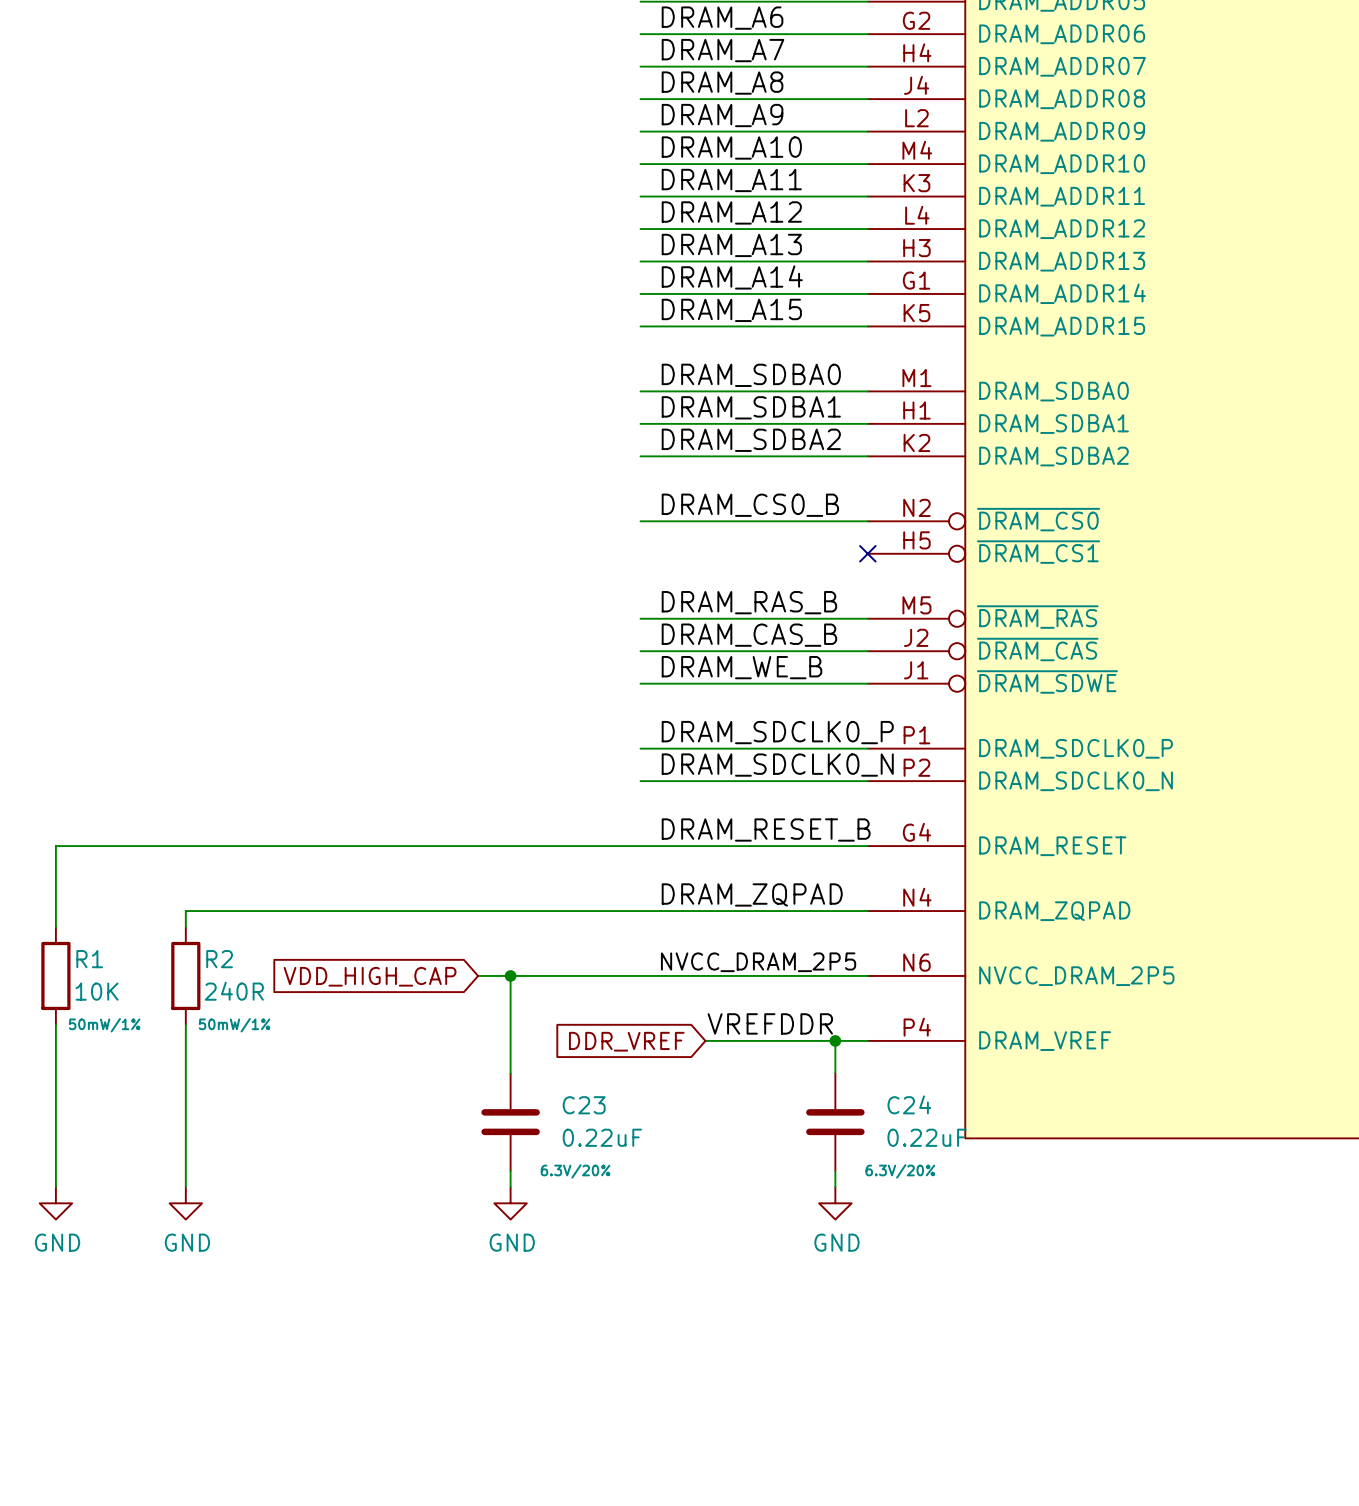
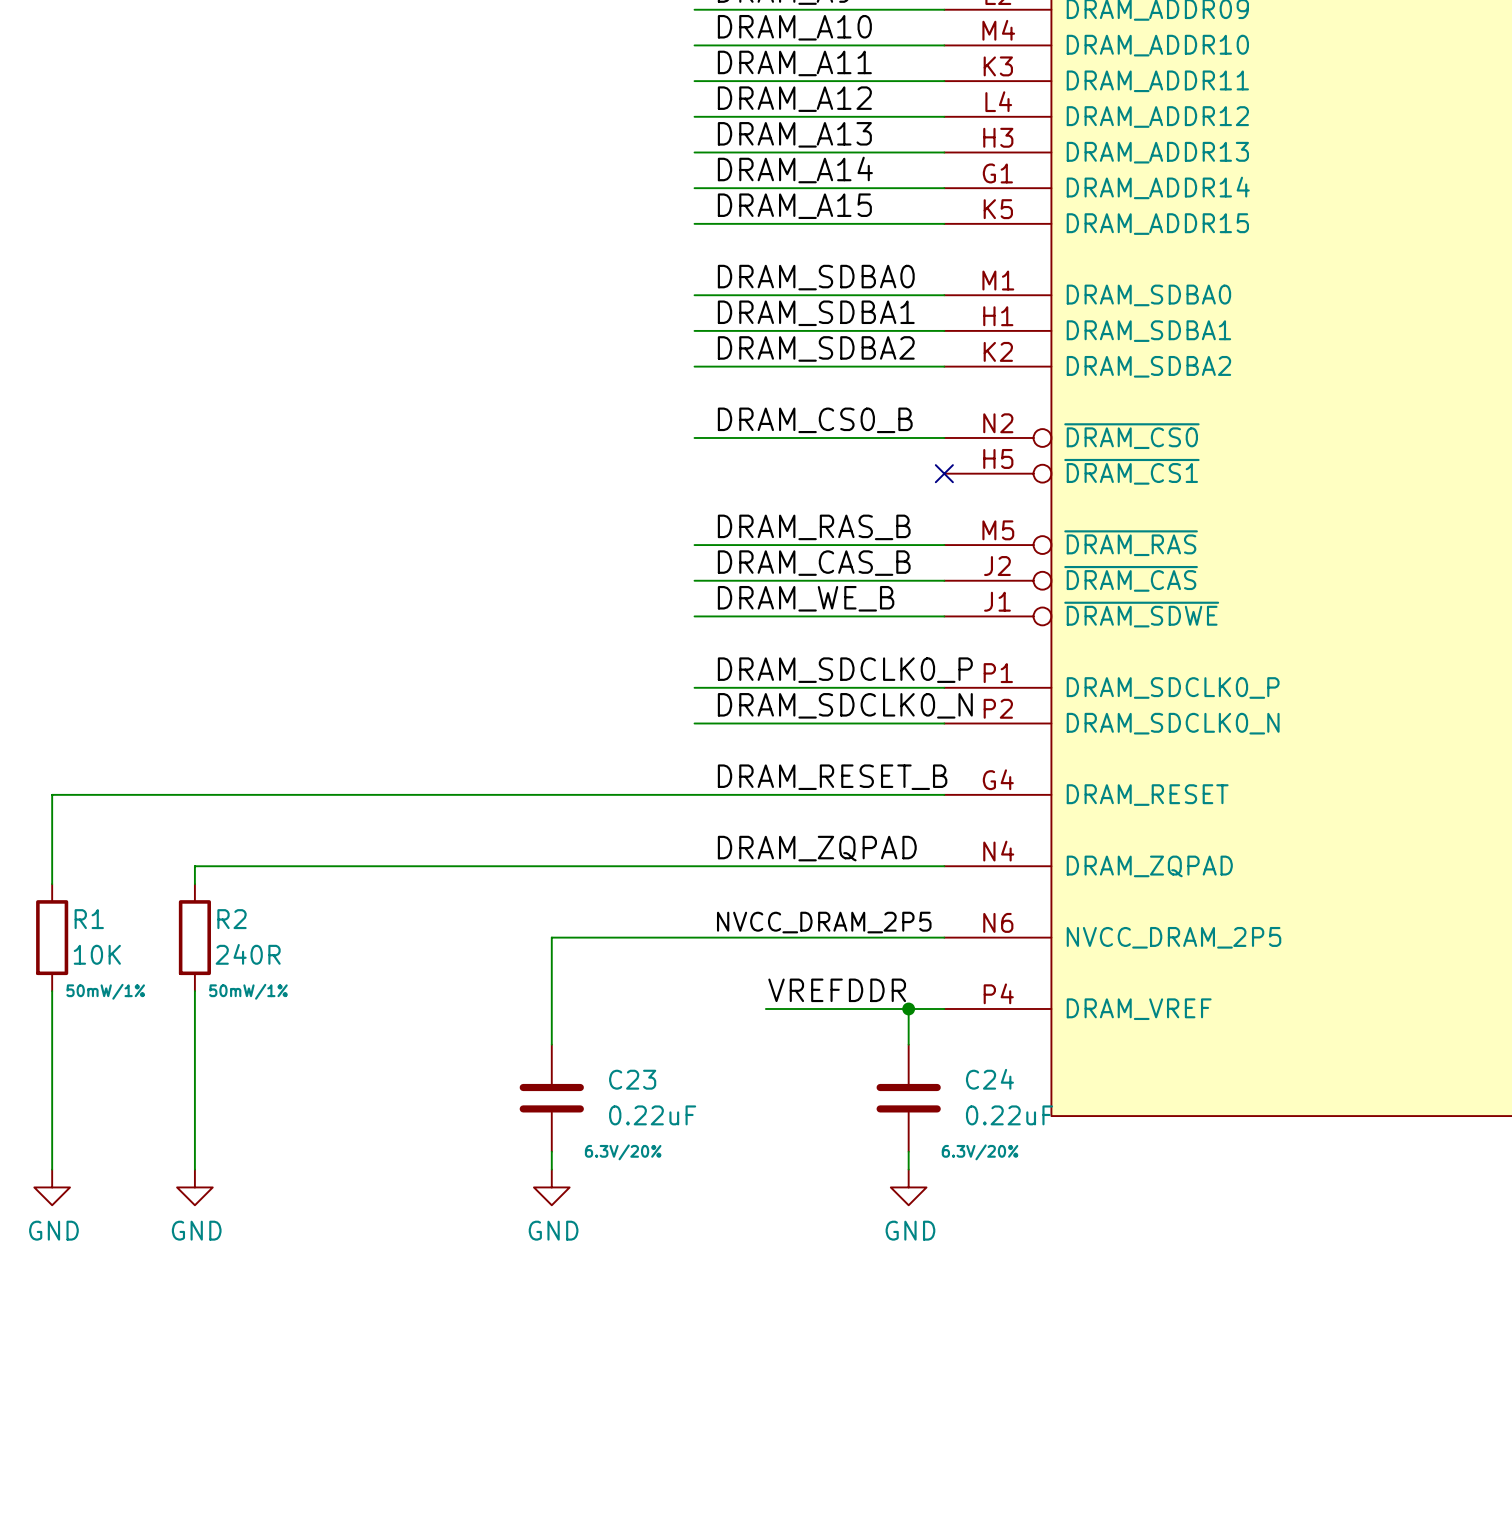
wire: (478, 975) (510, 975) -> none
junction: (510, 975) -> none
global label: VDD_HIGH_CAP (370, 976) -> none
global label: DDR_VREF (626, 1041) -> none

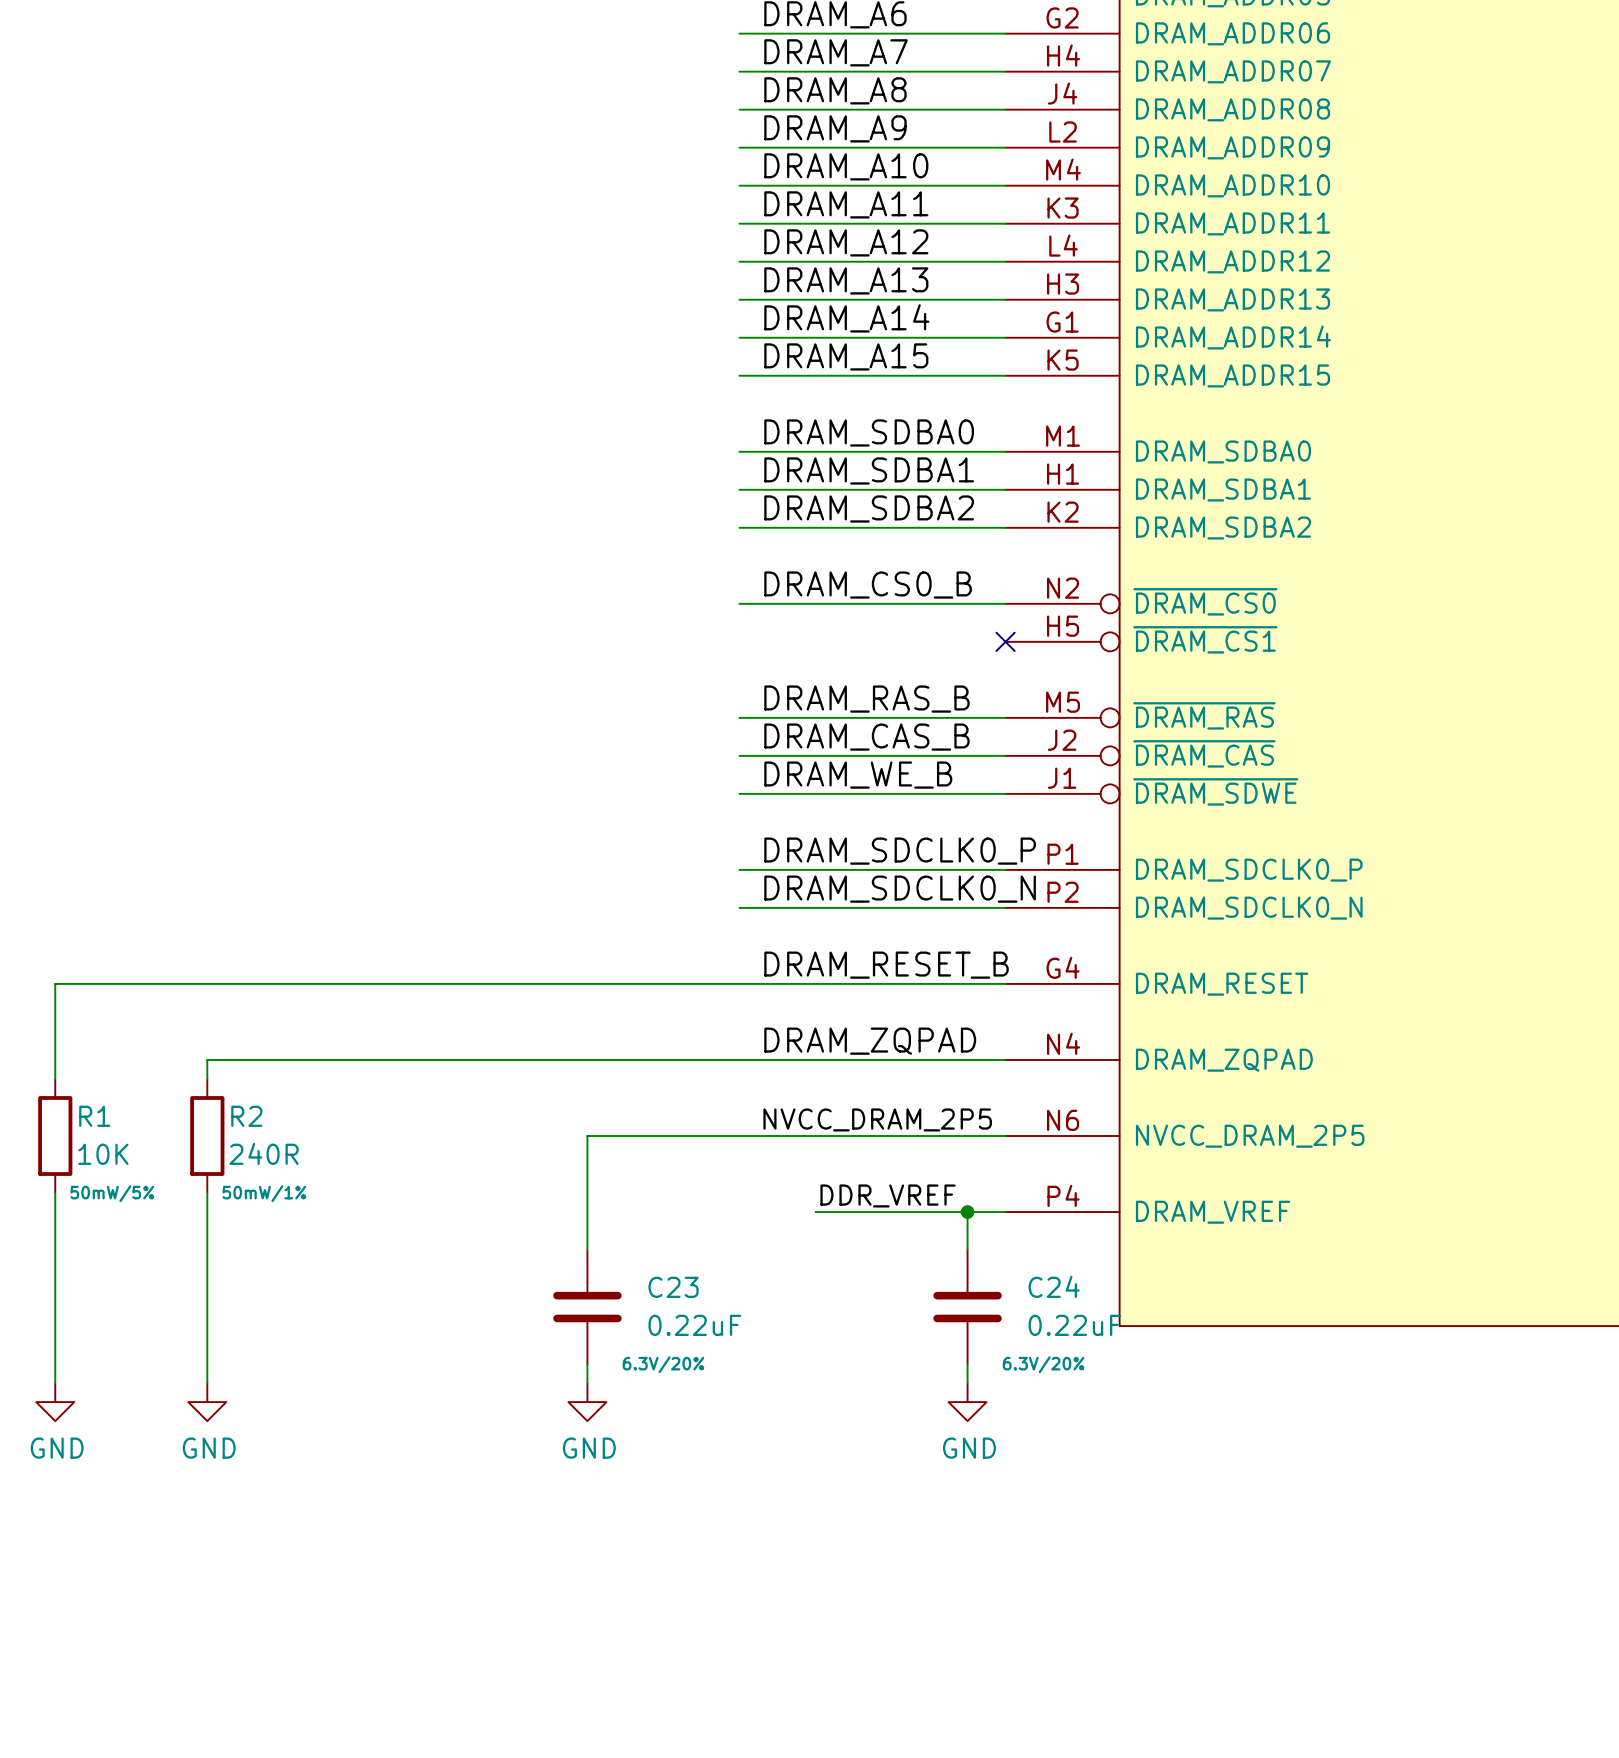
label: VREFDDR (837, 990) -> DDR_VREF (888, 1195)
R1 text: 50mW/1% (105, 991) -> 50mW/5% (112, 1193)

